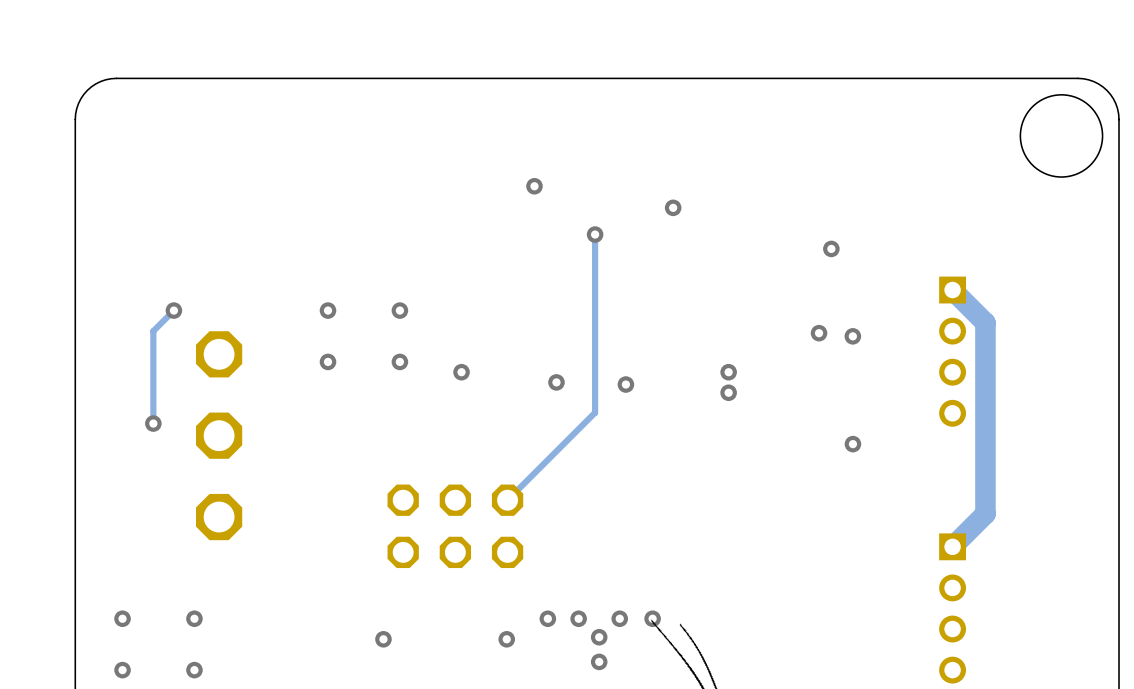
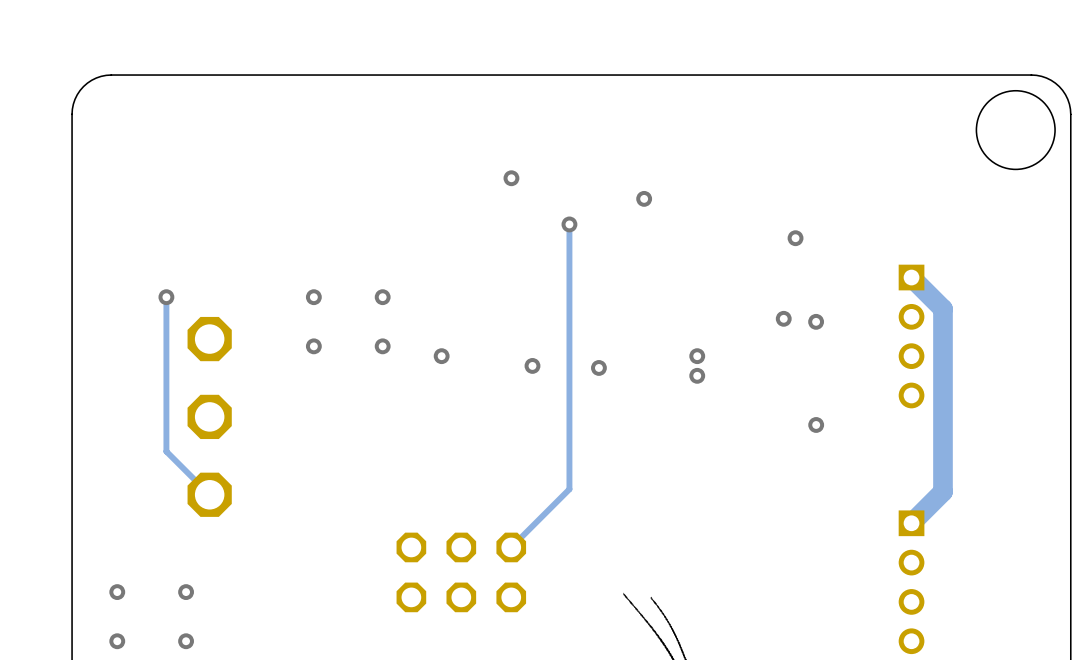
track: (173, 310) (153, 331) (153, 423) -> (166, 297) (166, 451) (209, 494)
track: (595, 412) (507, 500) -> (569, 394) (569, 489) (511, 547)
via: (153, 423) -> none
part: (455, 526) -> none
part: none -> (461, 572)
via: (547, 618) -> none
via: (578, 618) -> none
via: (619, 618) -> none
via: (652, 618) -> none
via: (599, 637) -> none
via: (383, 639) -> none
via: (506, 639) -> none
via: (599, 661) -> none

